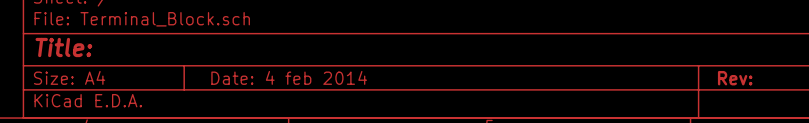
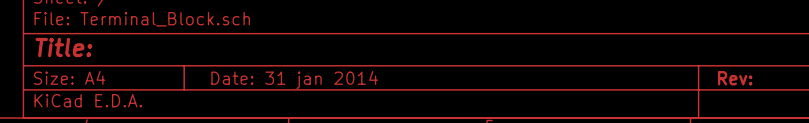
title block: Date: 4 feb 2014 (289, 77) -> Date: 31 jan 2014 (294, 79)

